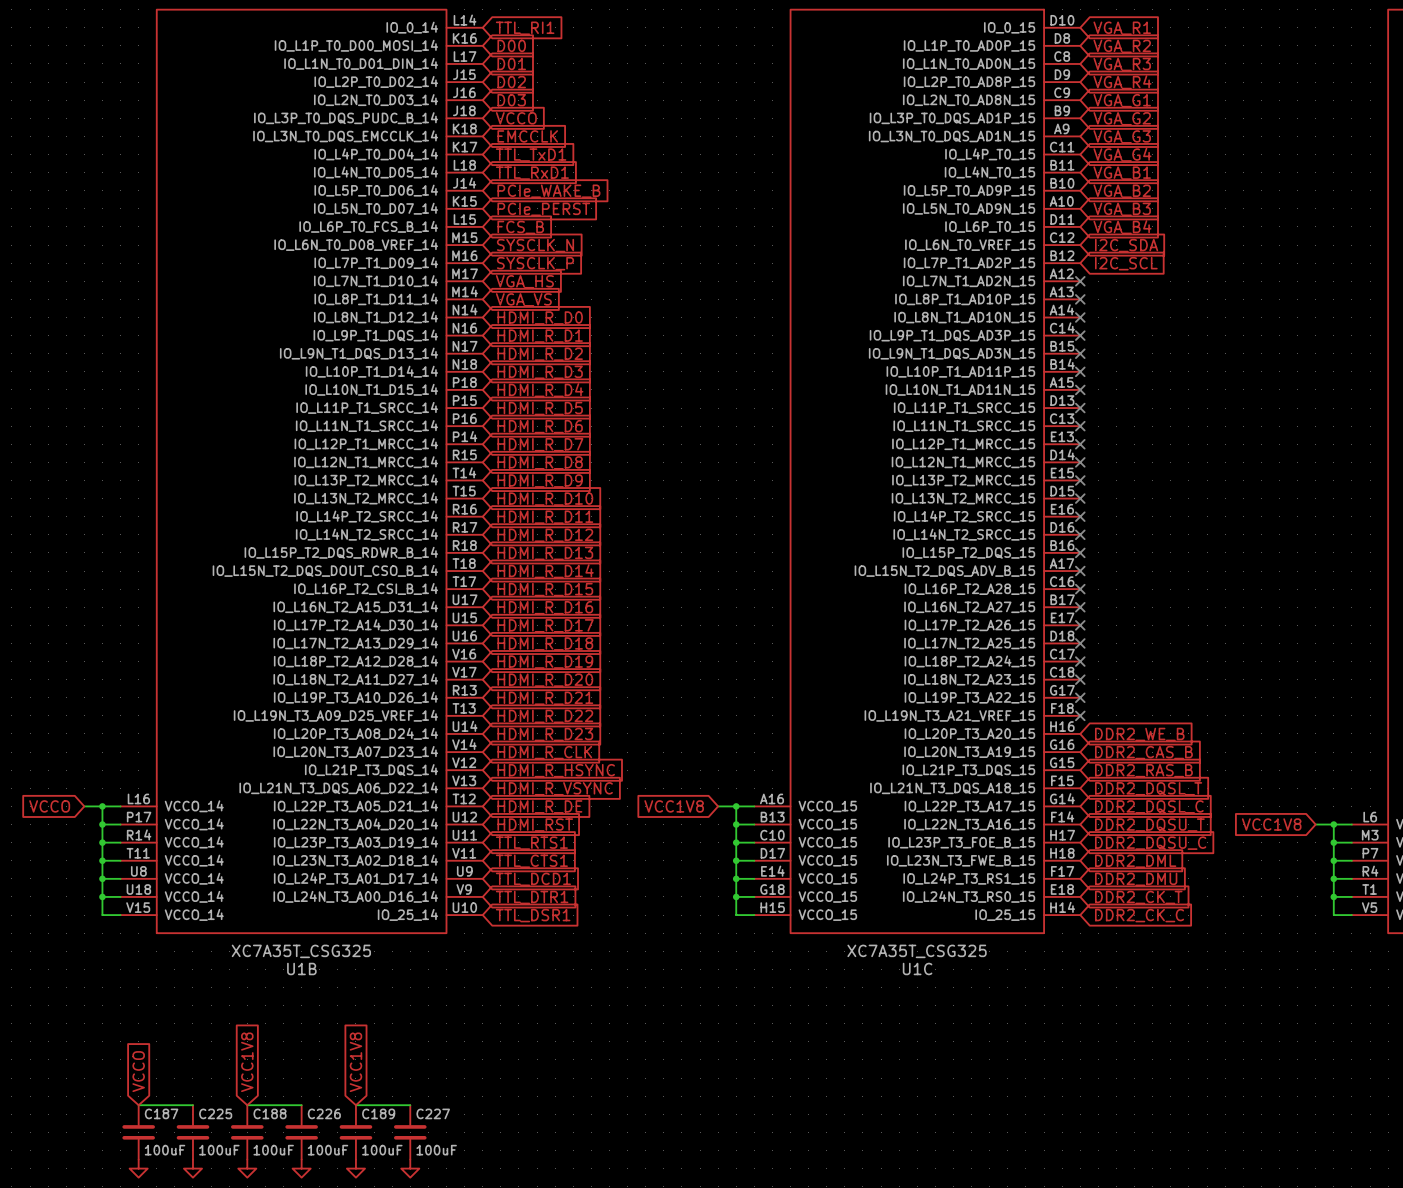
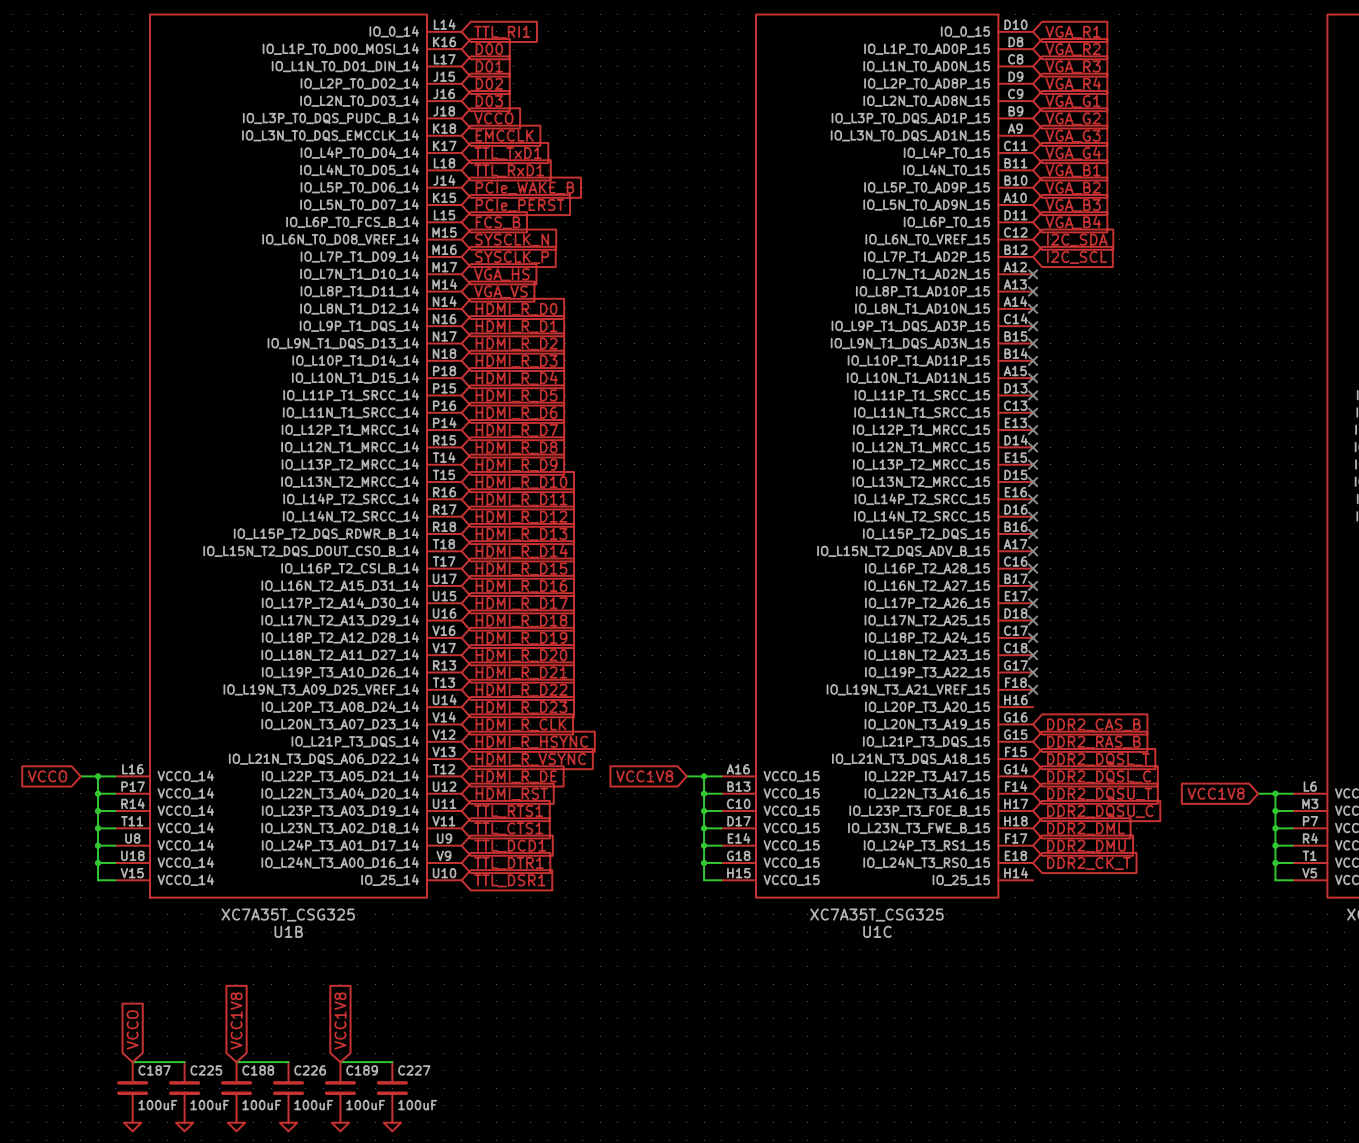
global label: DDR2_WE_B (1139, 734) -> none
global label: DDR2_CK_C (1139, 915) -> none

